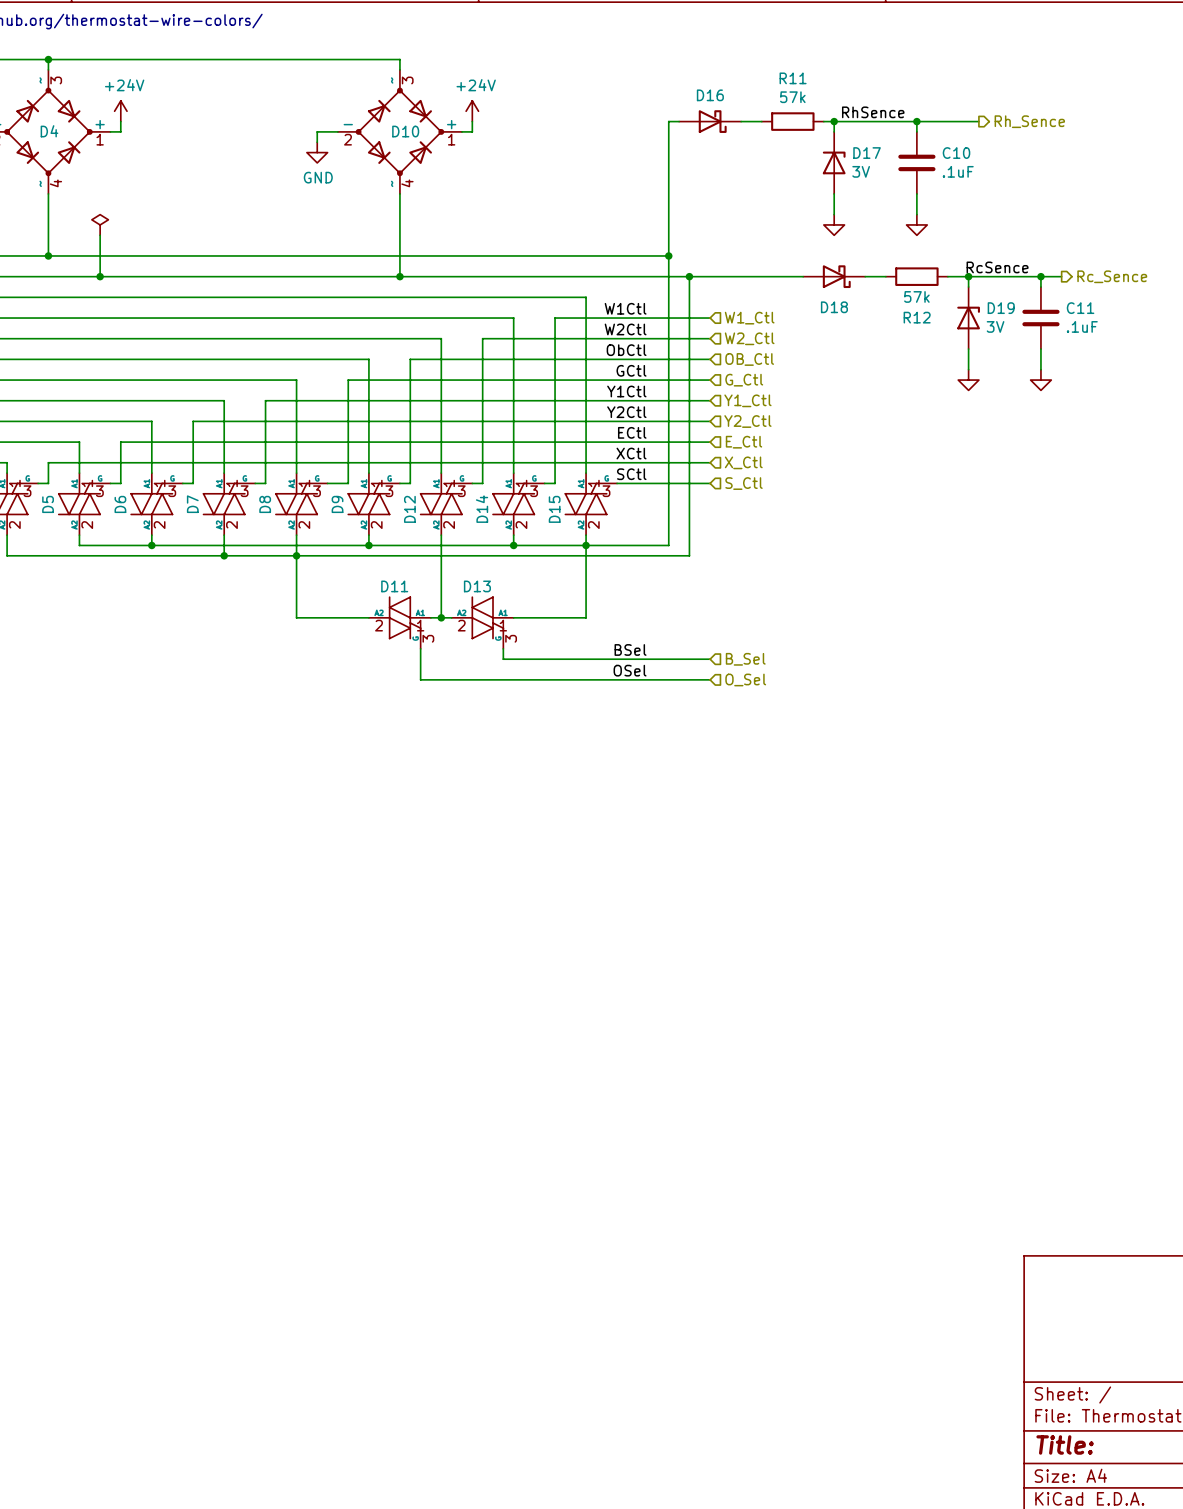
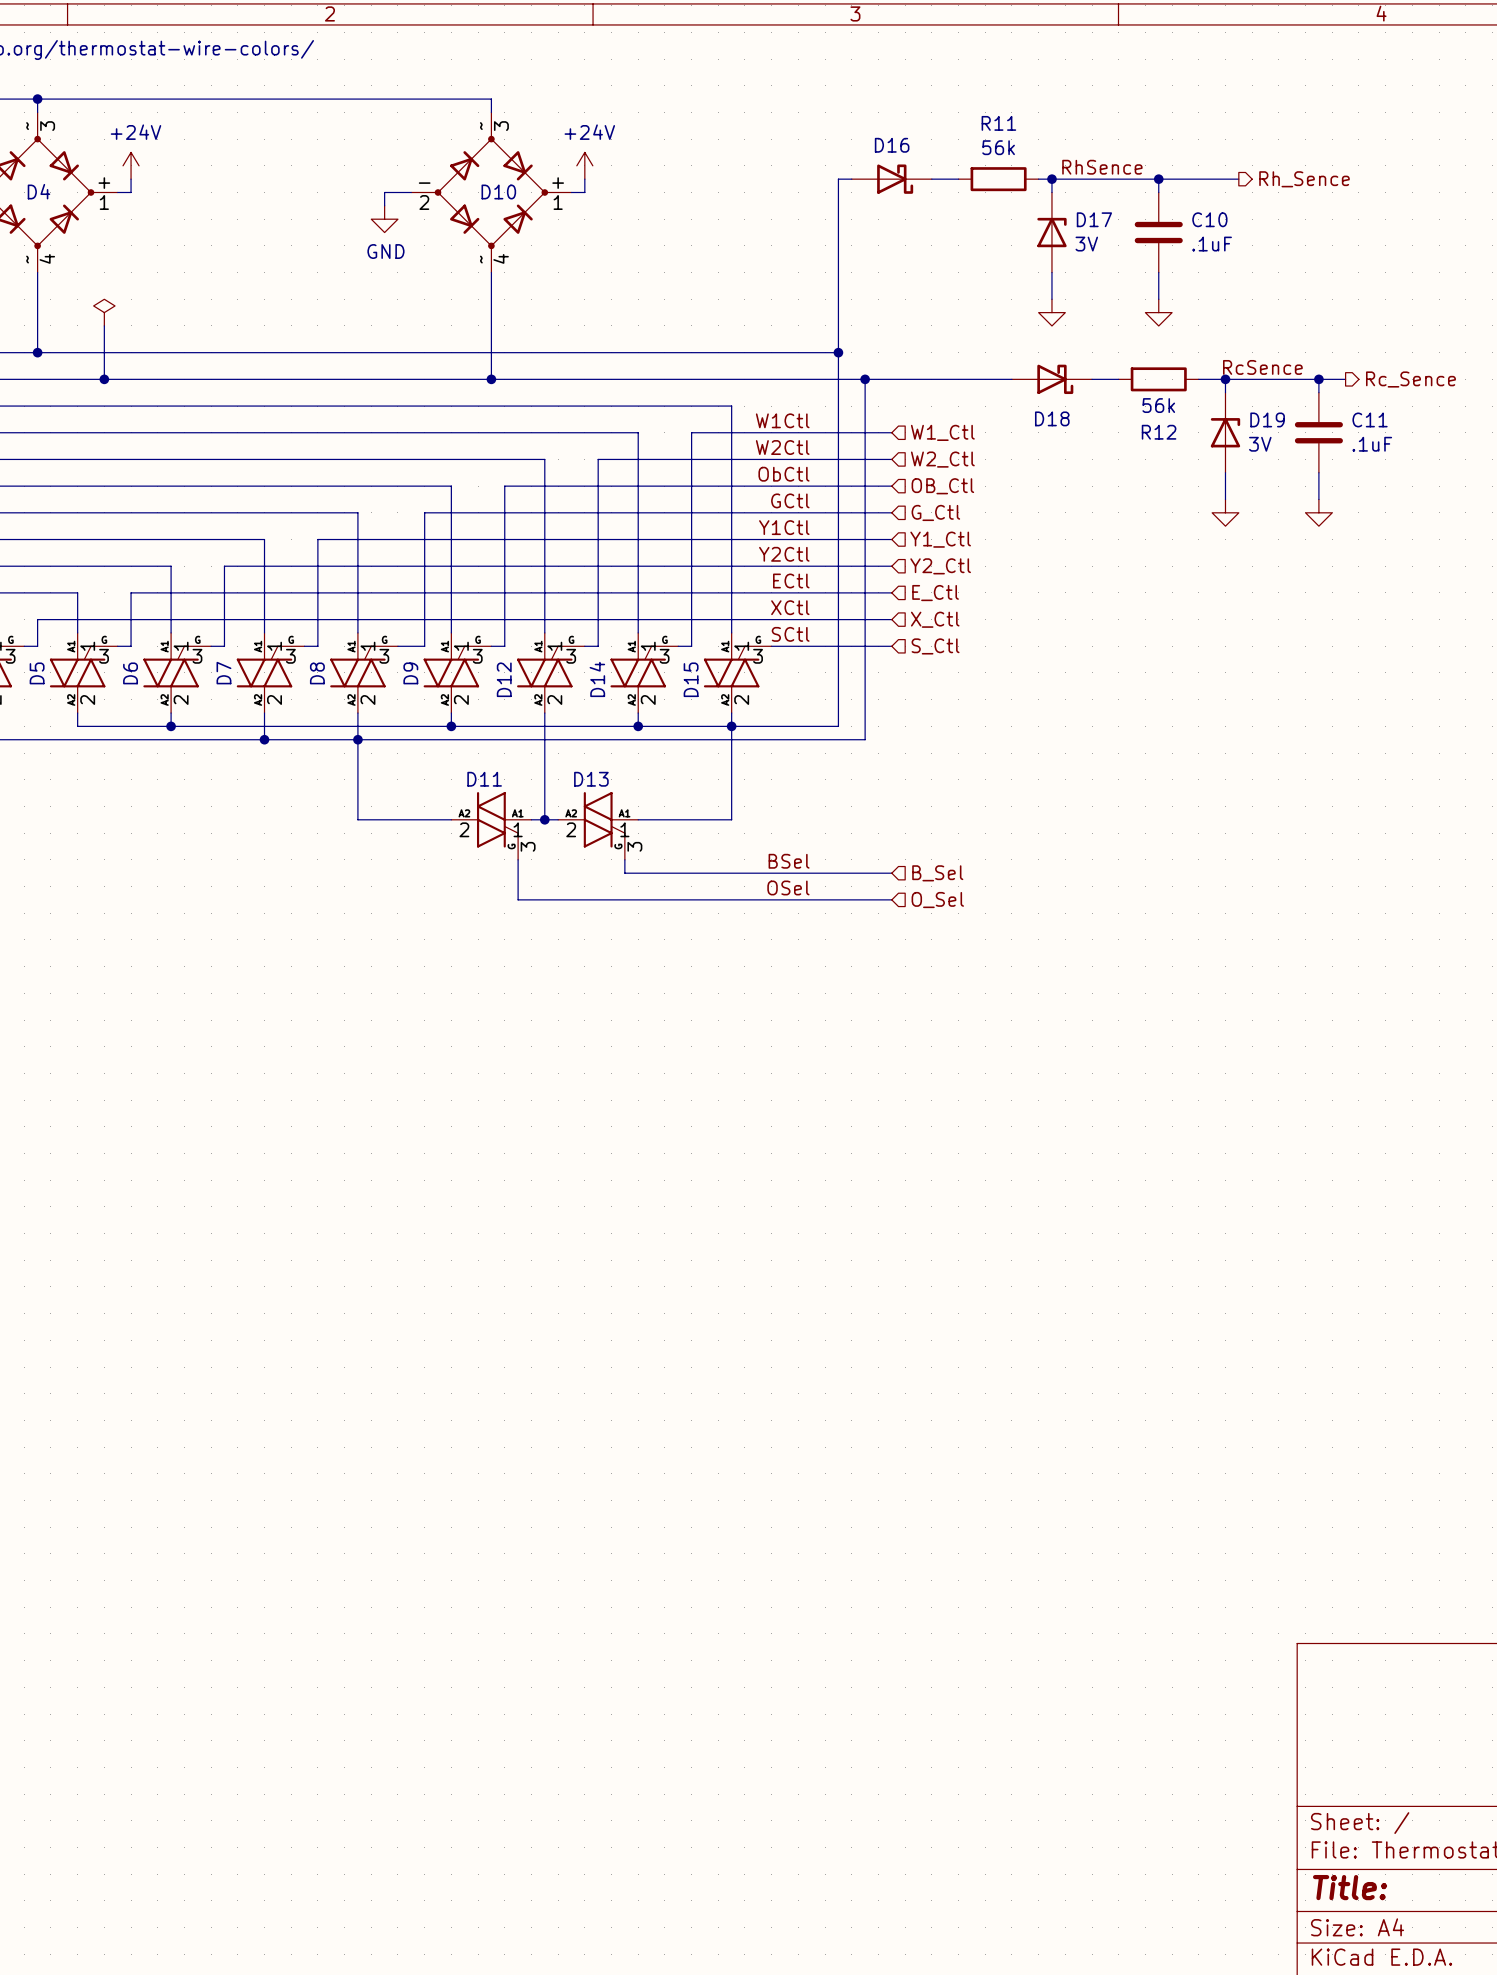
R11 value: 57k (792, 97) -> 56k (998, 147)
R12 value: 57k (916, 296) -> 56k (1158, 405)

